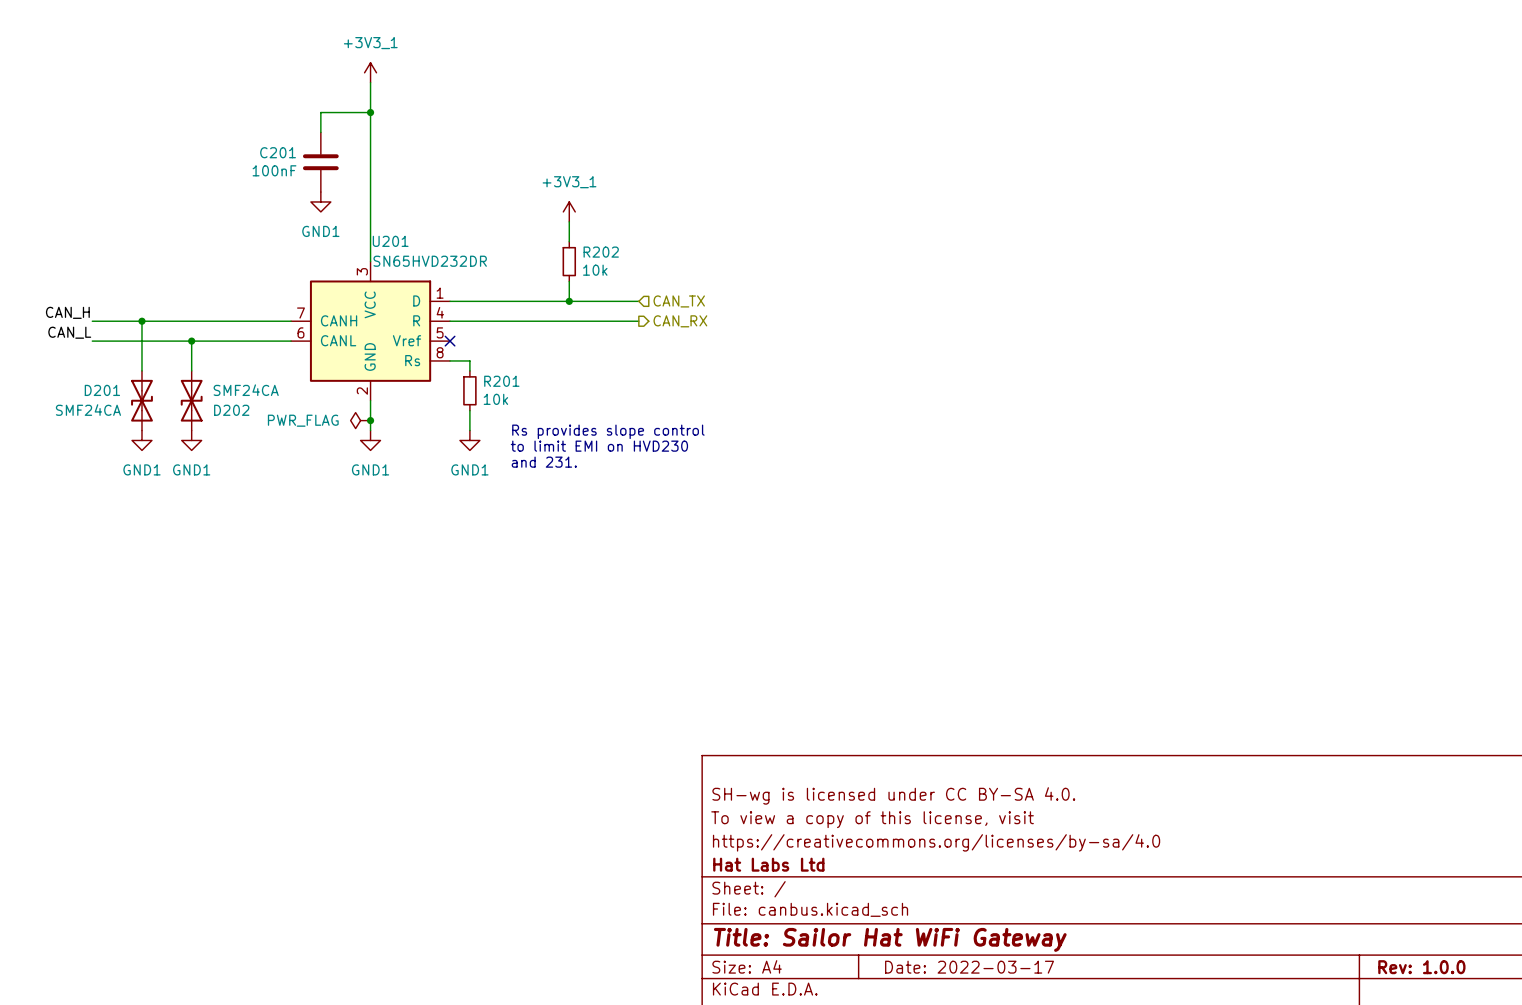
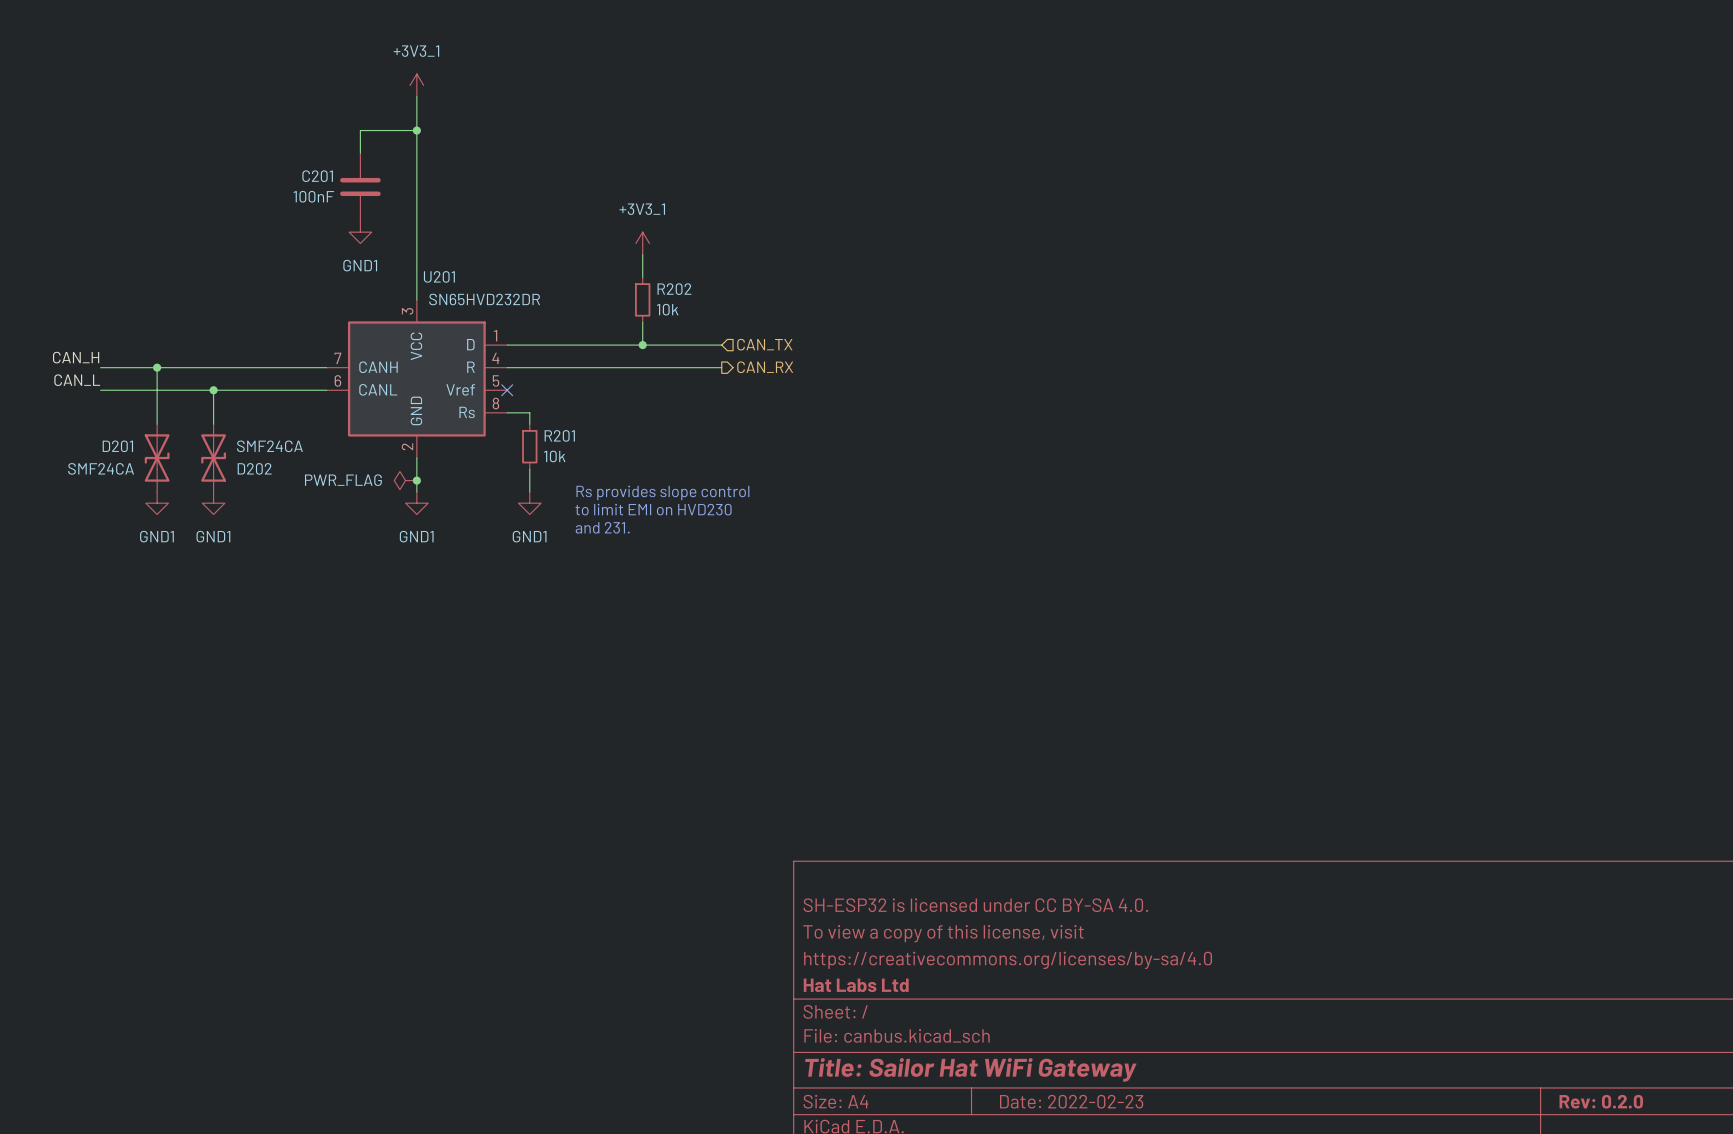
title block: SH-wg is licensed under CC BY-SA 4.0. (893, 795) -> SH-ESP32 is licensed under CC BY-SA 4.0. (975, 905)
title block: Date: 2022-03-17 (969, 967) -> Date: 2022-02-23 (1071, 1101)
title block: Rev: 1.0.0 (1421, 967) -> Rev: 0.2.0 (1601, 1101)

